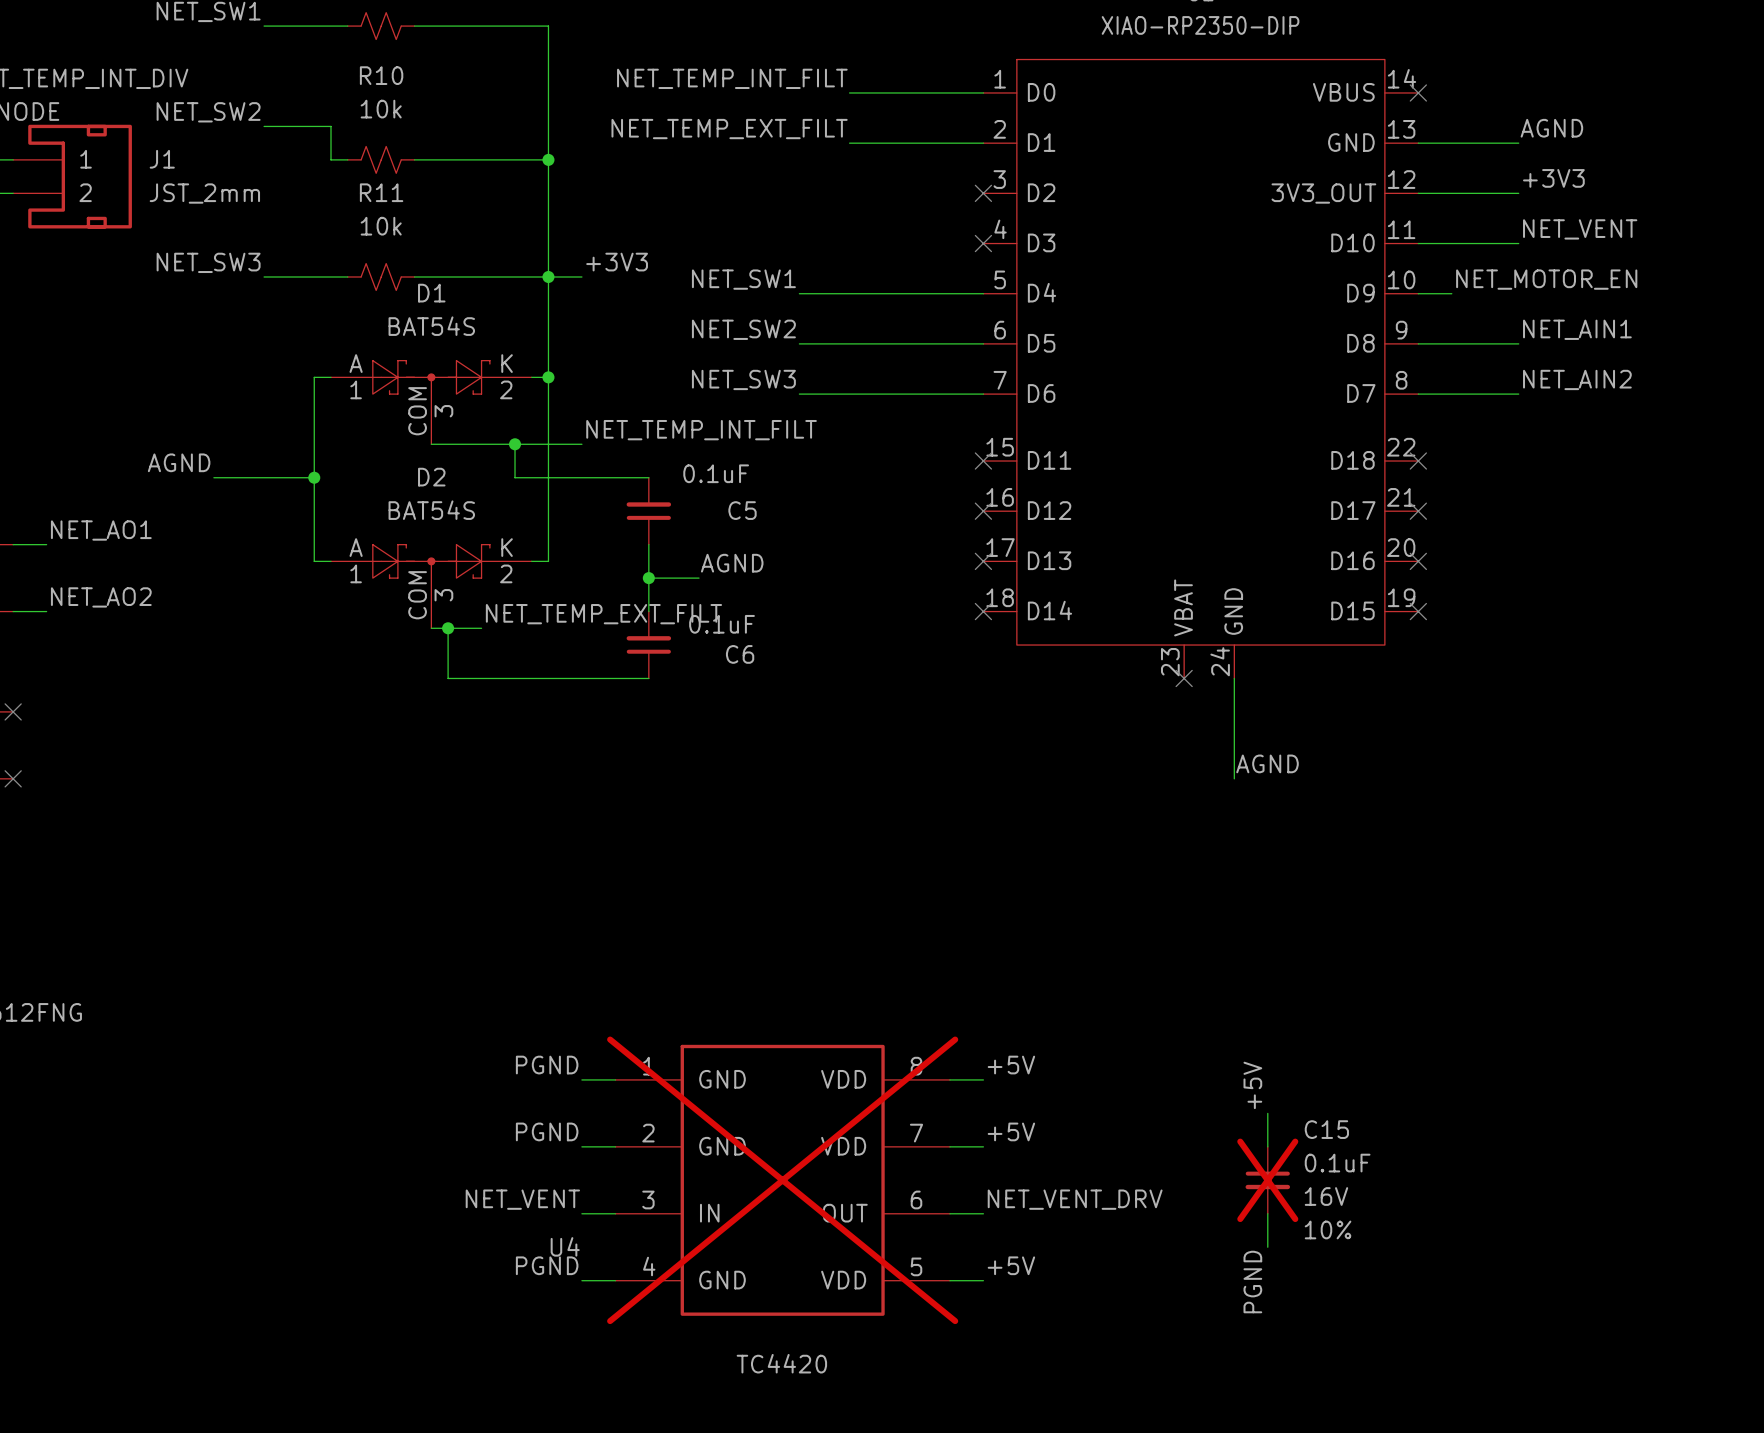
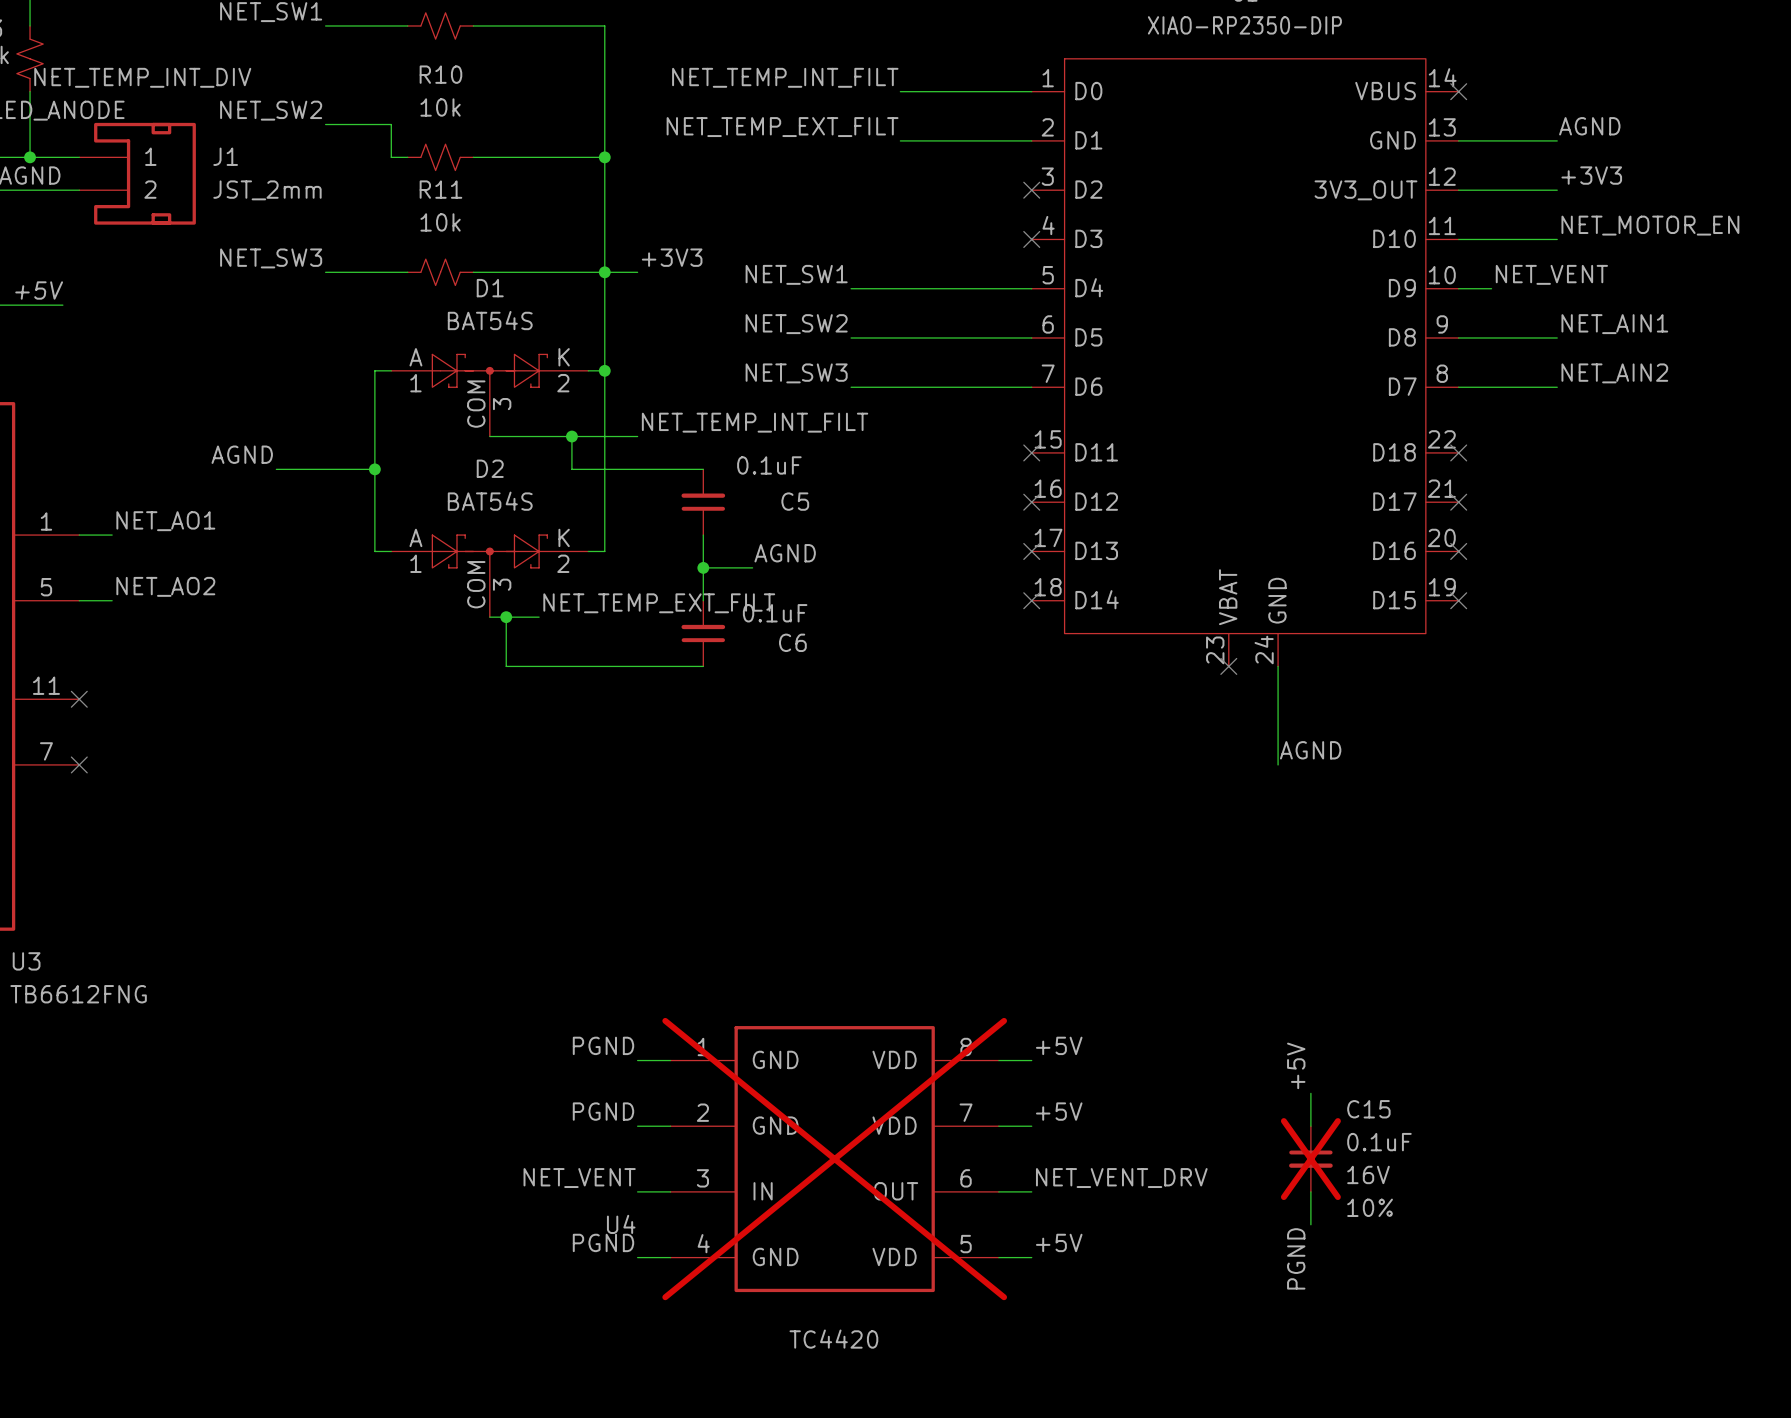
label: NET_VENT (1580, 229) -> NET_MOTOR_EN (1650, 225)
label: NET_MOTOR_EN (1546, 279) -> NET_VENT (1551, 274)

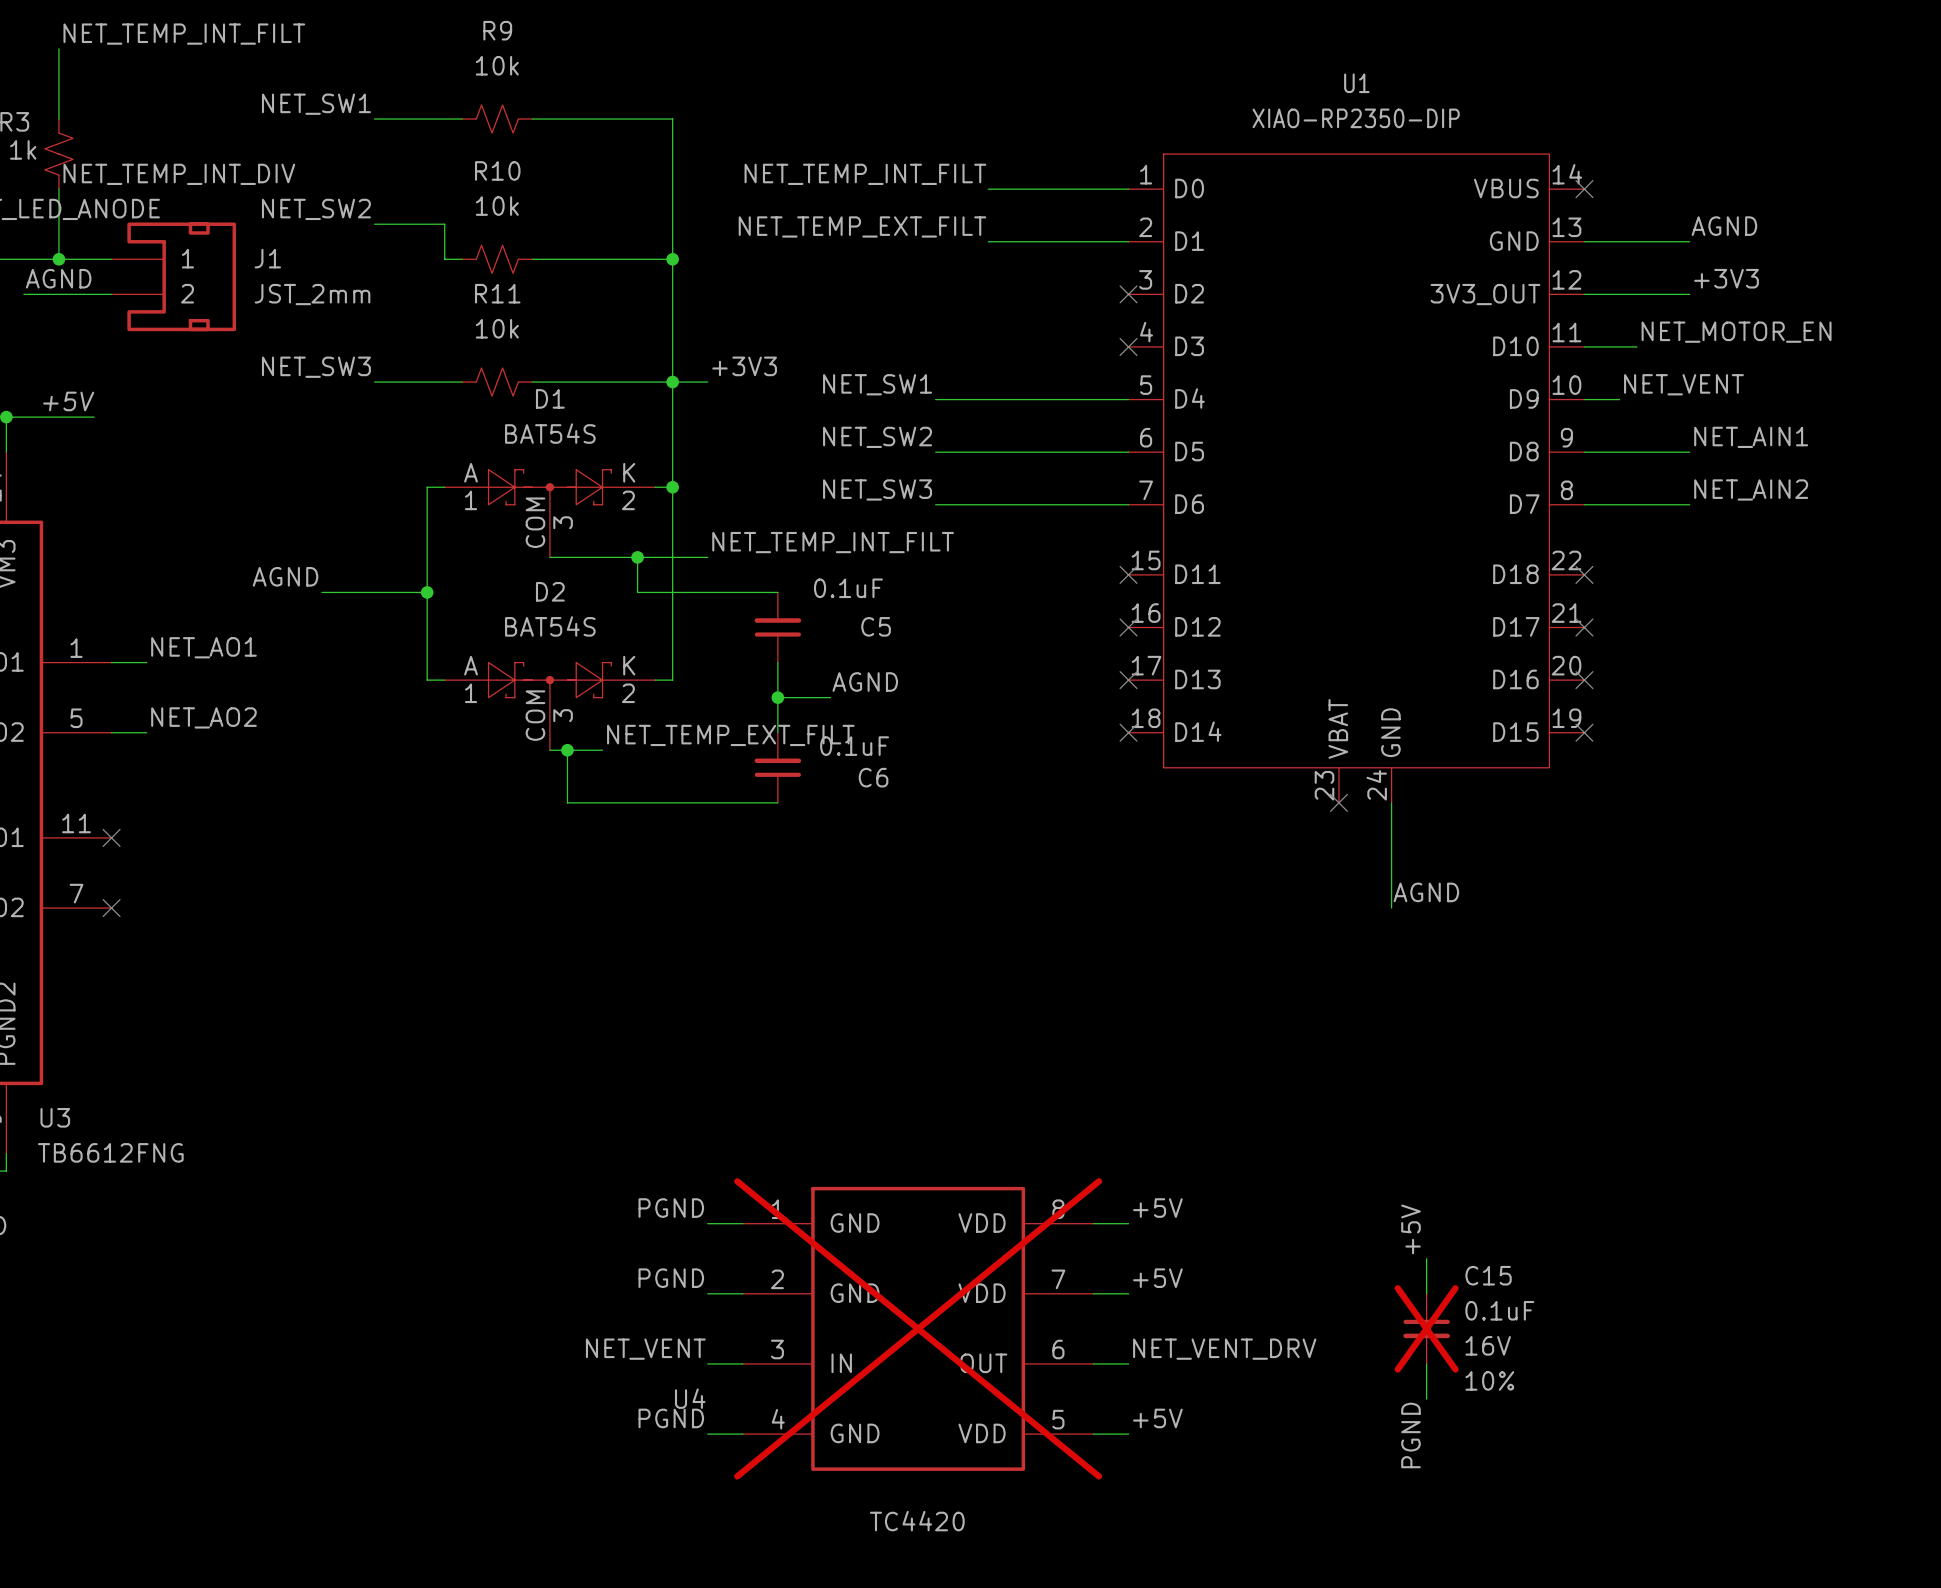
label position: NET_MOTOR_EN (1650, 225) -> NET_MOTOR_EN (1736, 332)
wire: (1507, 239) (1557, 239) -> none

